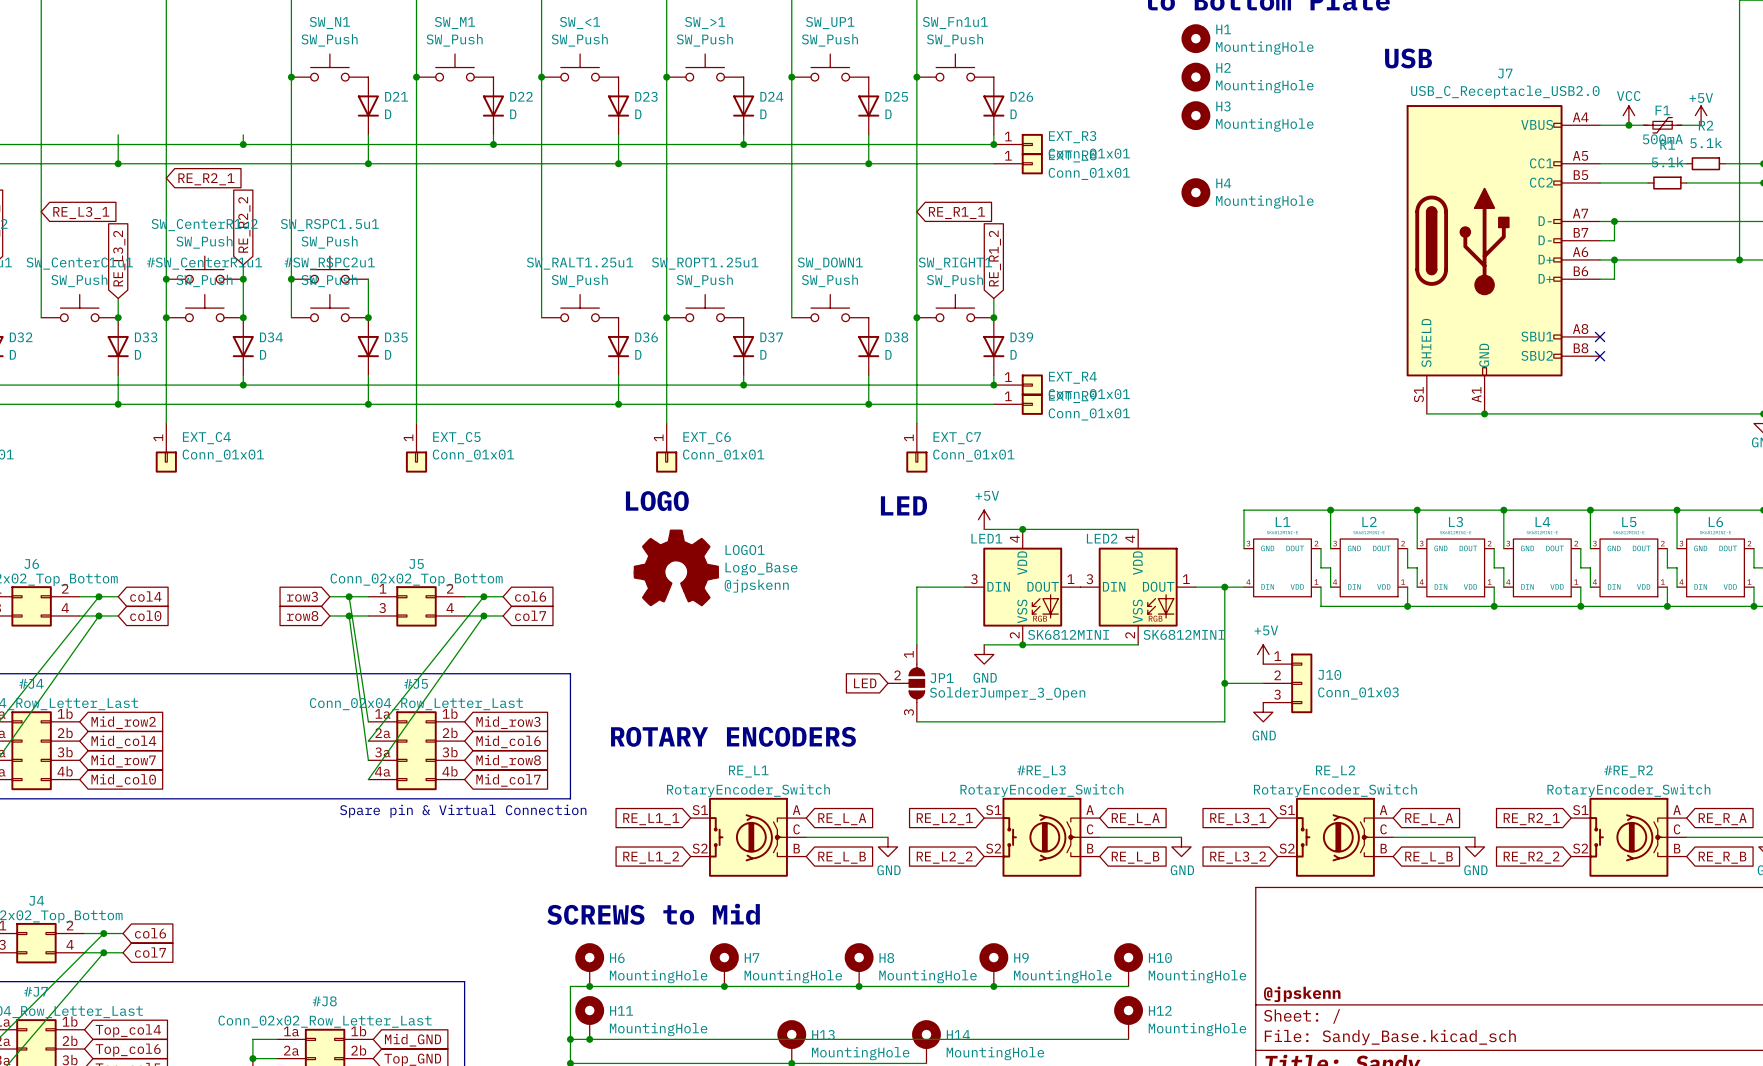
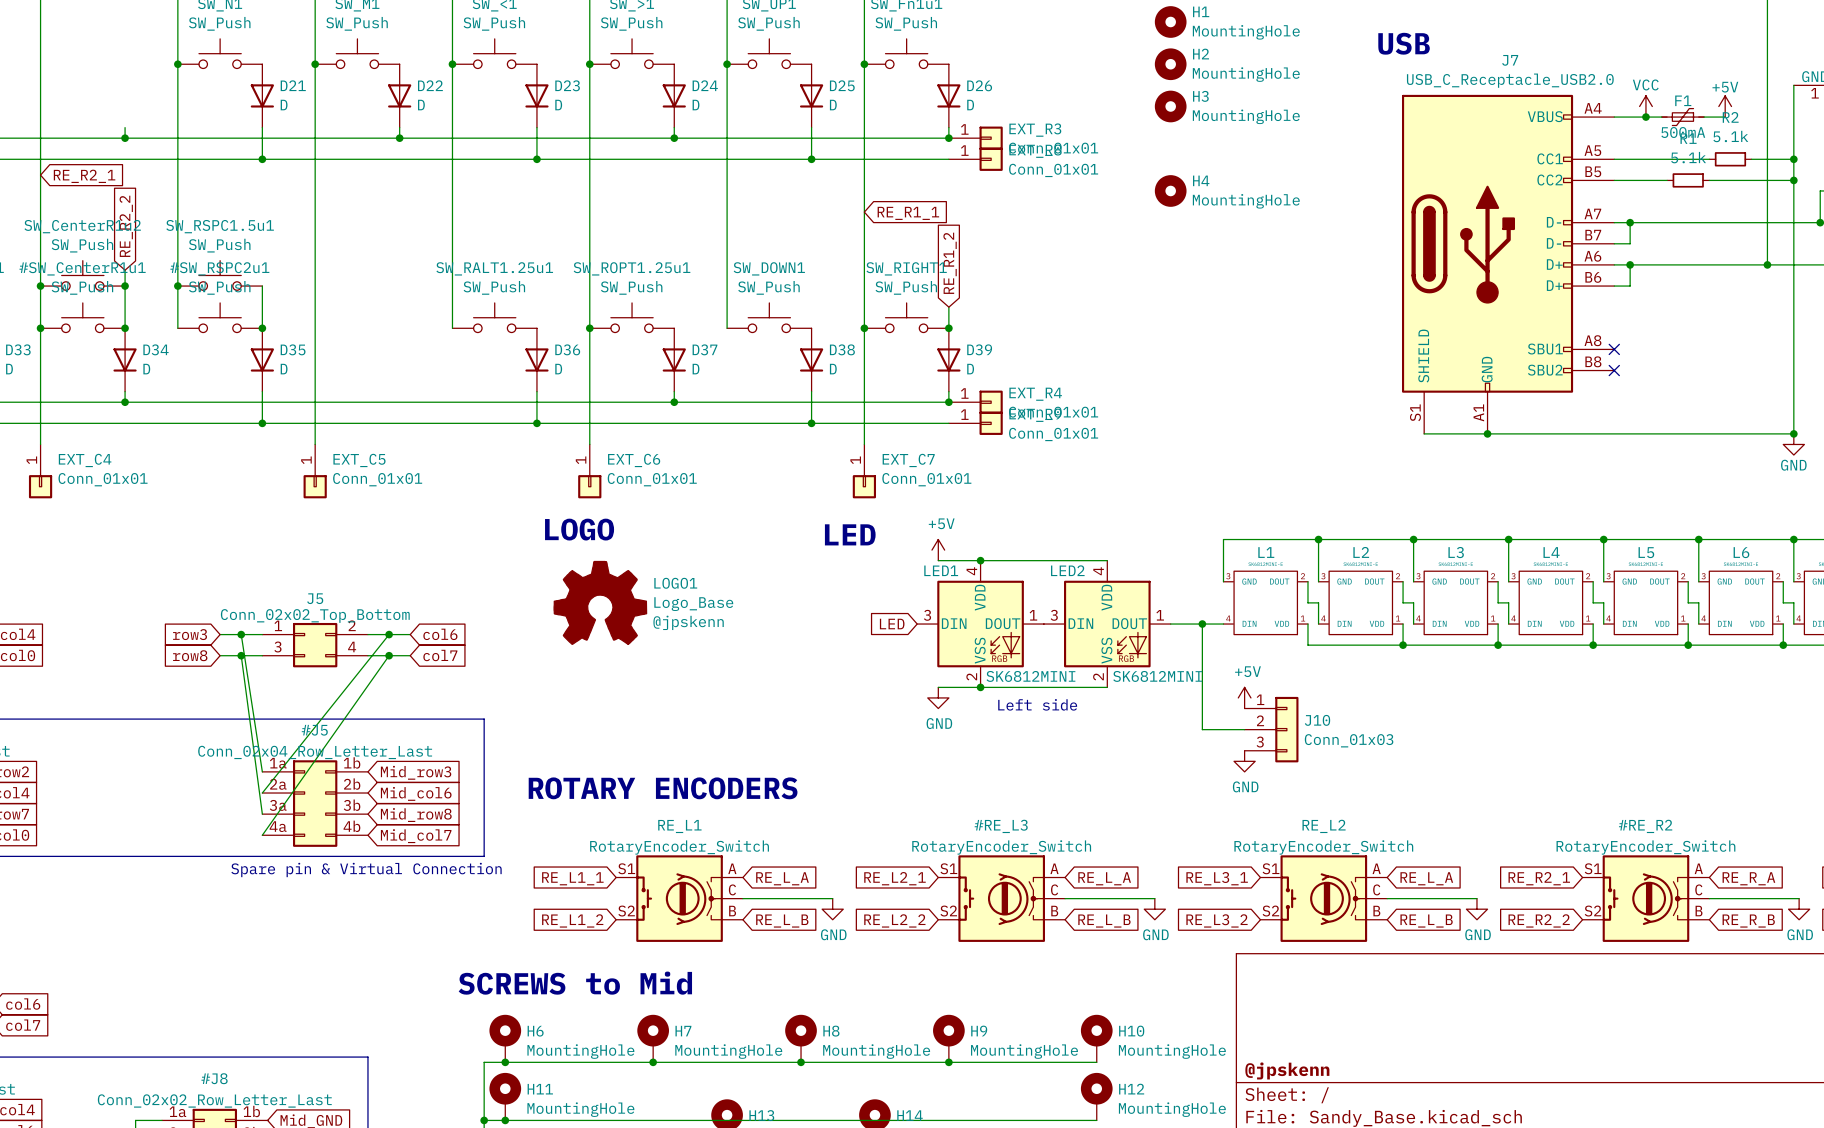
wire: (964, 587) (916, 587) (916, 644) -> none
text: none -> Left side (1037, 704)
global label position: LED (865, 683) -> LED (892, 624)
JP1: SolderJumper_3_Open (906, 683) -> none
wire: (1224, 683) (1224, 721) (916, 721) -> none
junction: (1224, 683) -> none

